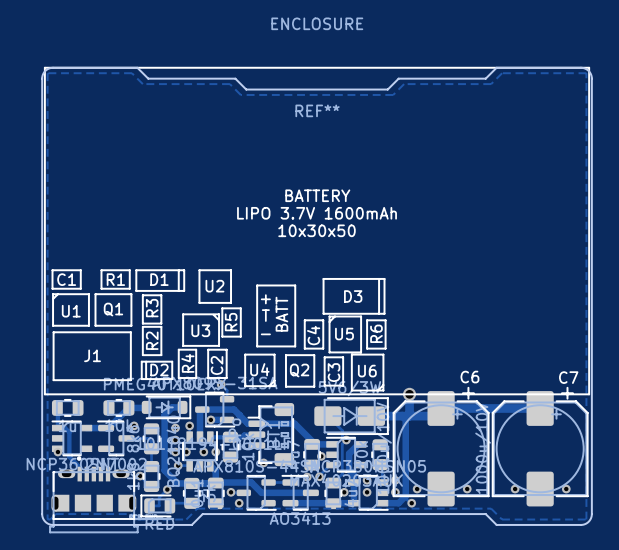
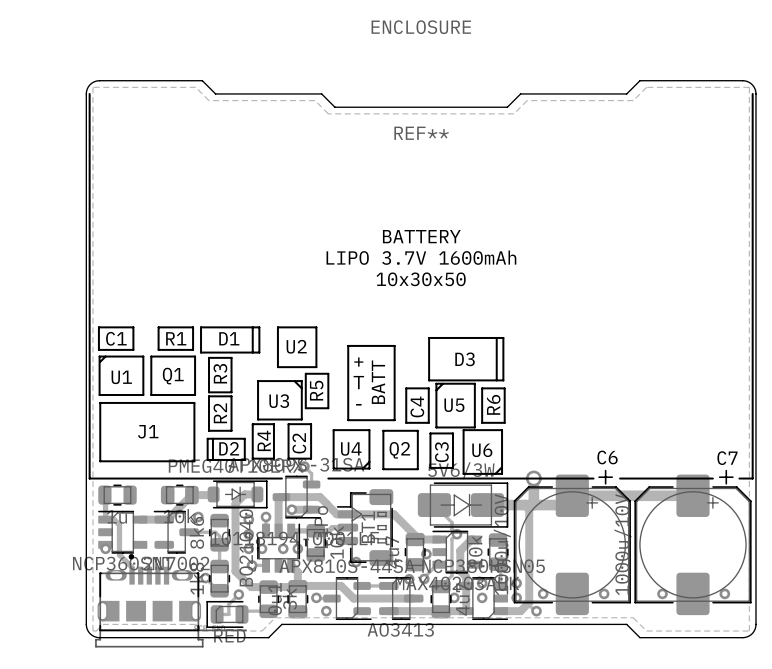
line: (44, 78) (44, 67) (589, 67) (589, 78) -> none
line: (202, 394) (240, 394) -> none
line: (458, 394) (480, 394) -> none
line: (556, 394) (578, 394) -> none

